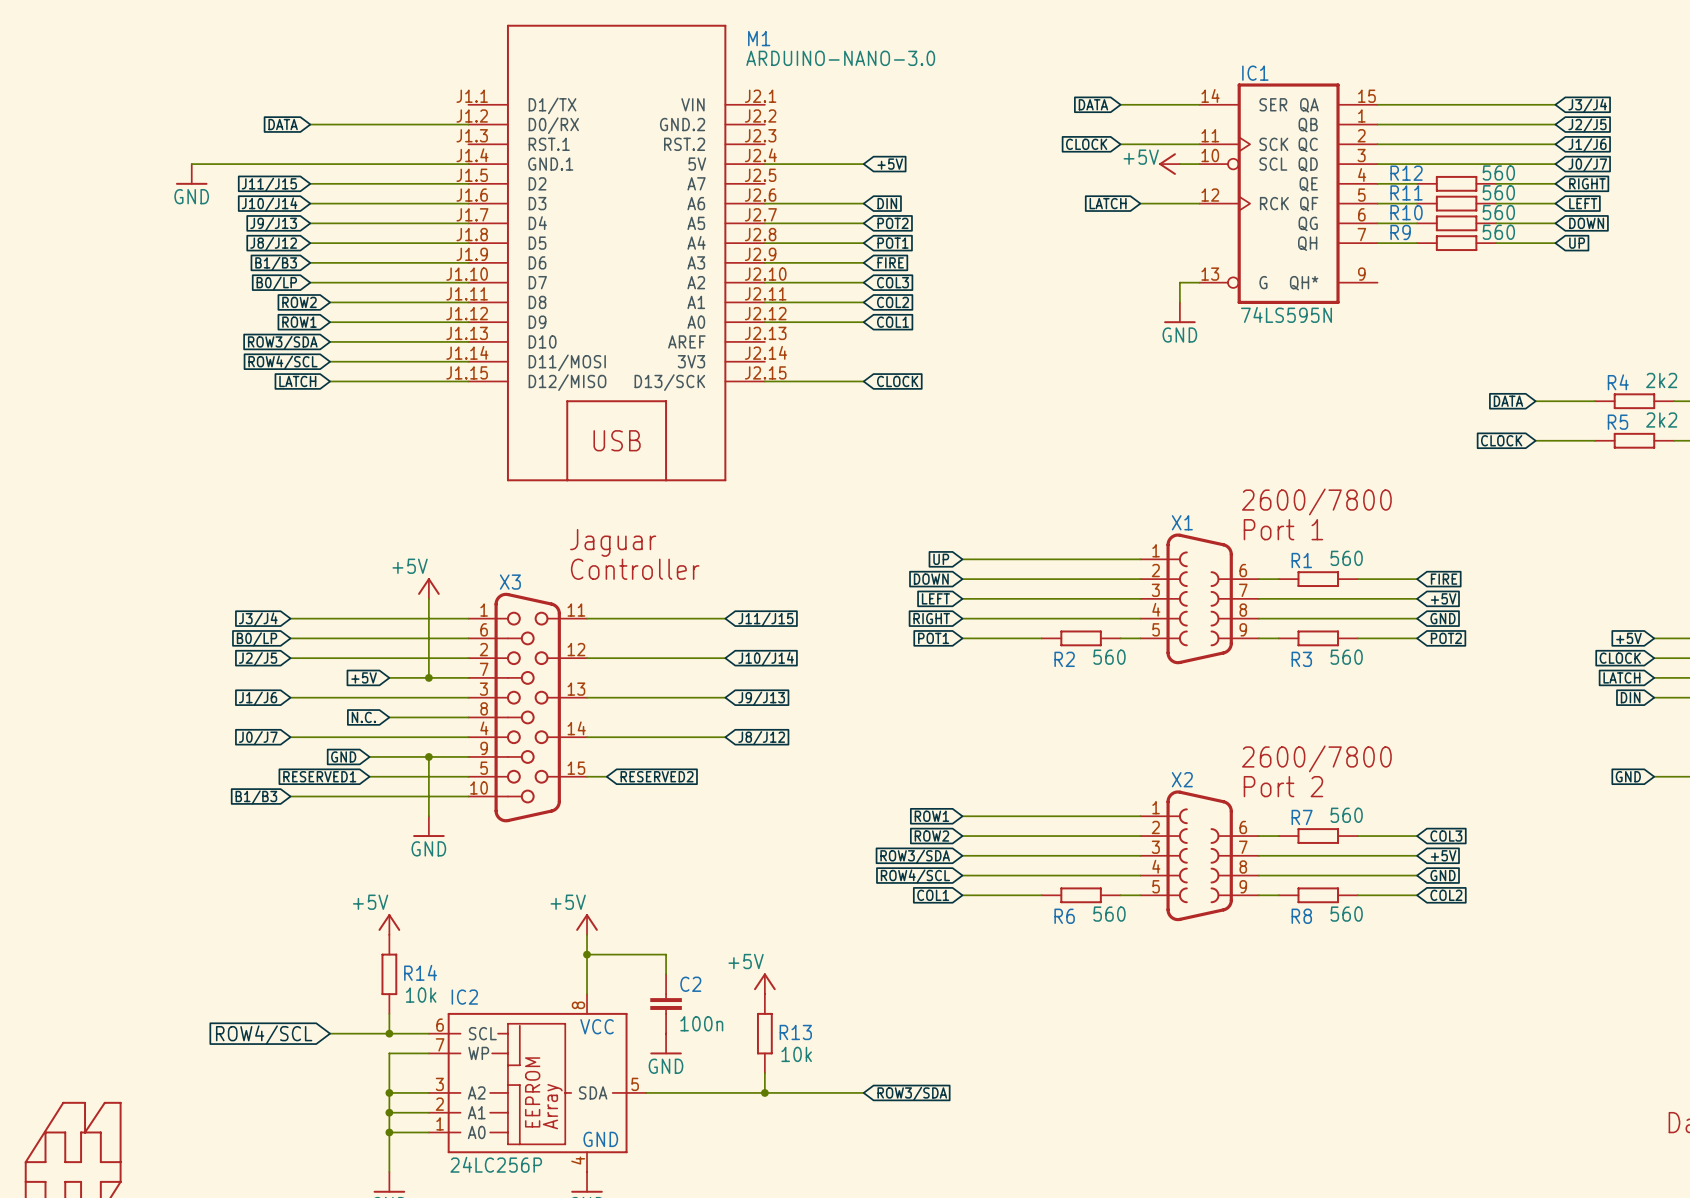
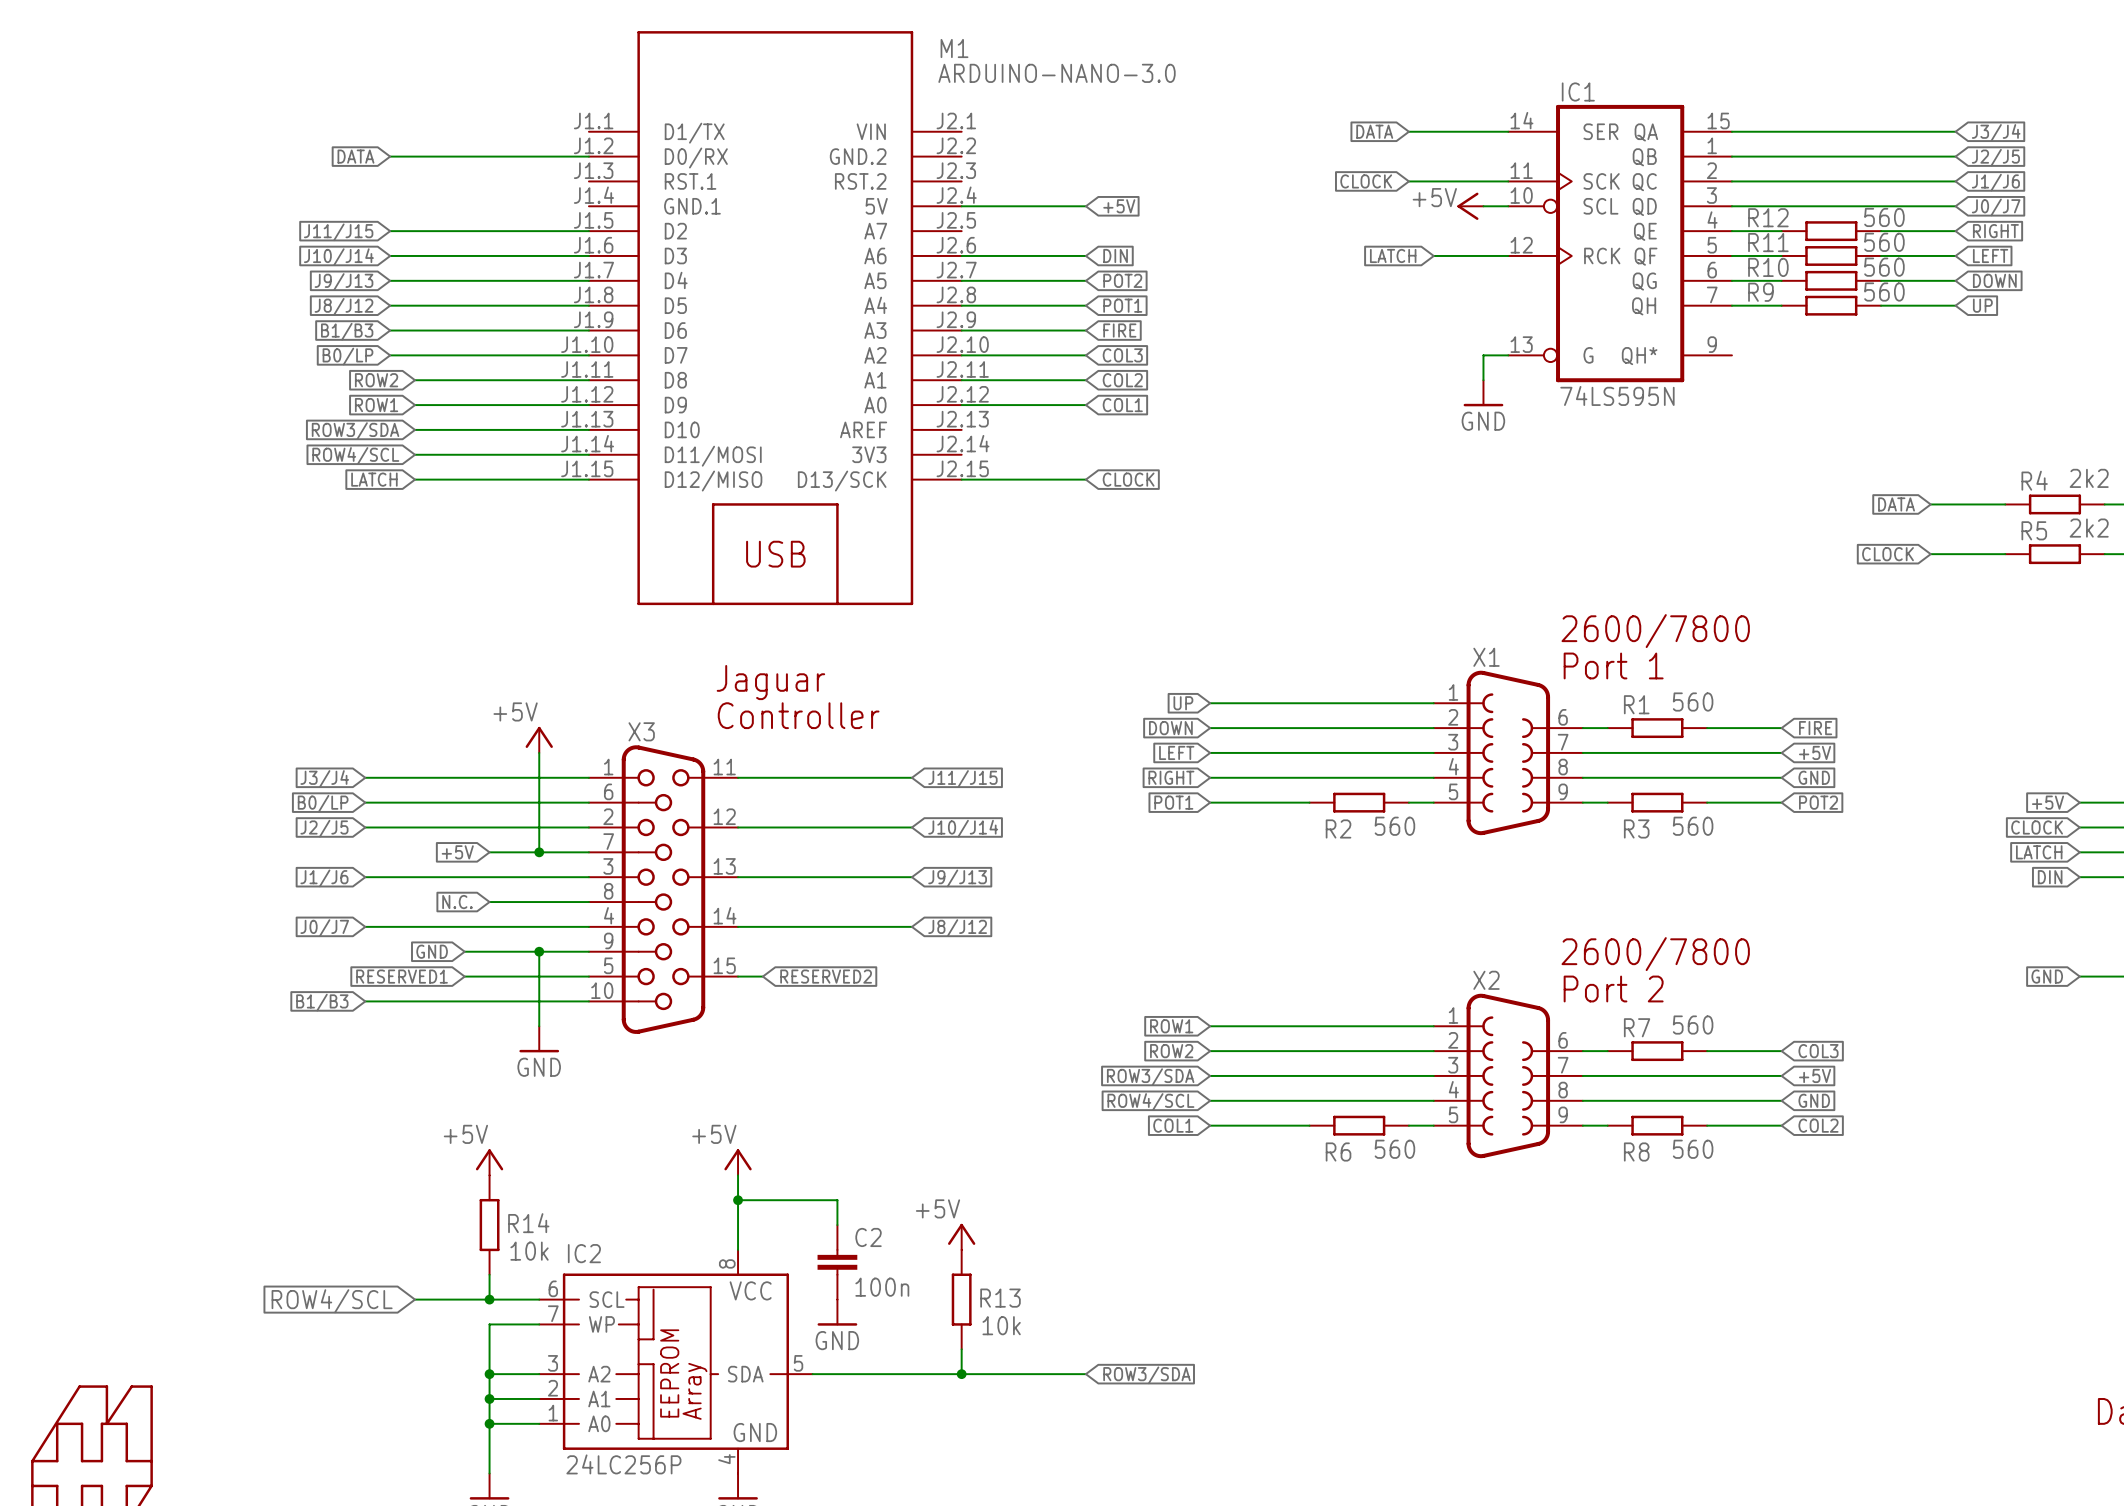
wire: (191, 164) (468, 164) -> none
power symbol: GND (191, 174) -> none

